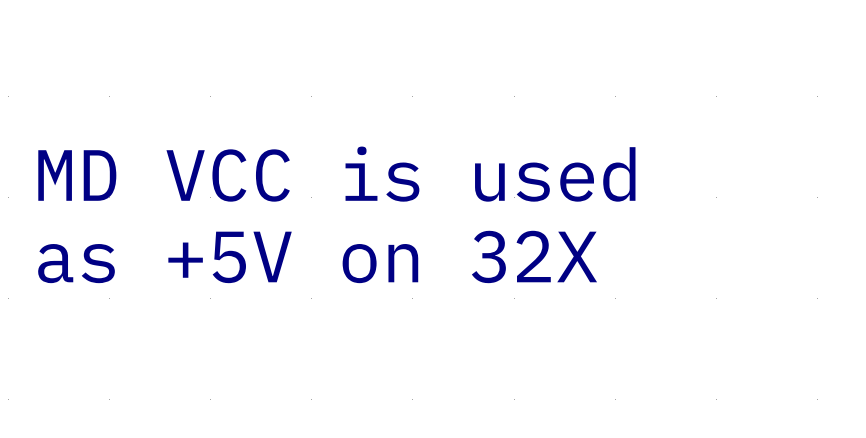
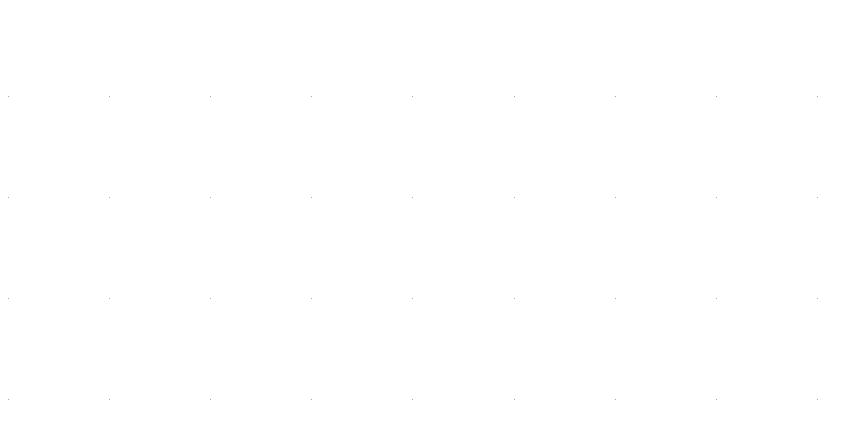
text: MD VCC is used (336, 174) -> none
text: as +5V on 32X (317, 256) -> none

